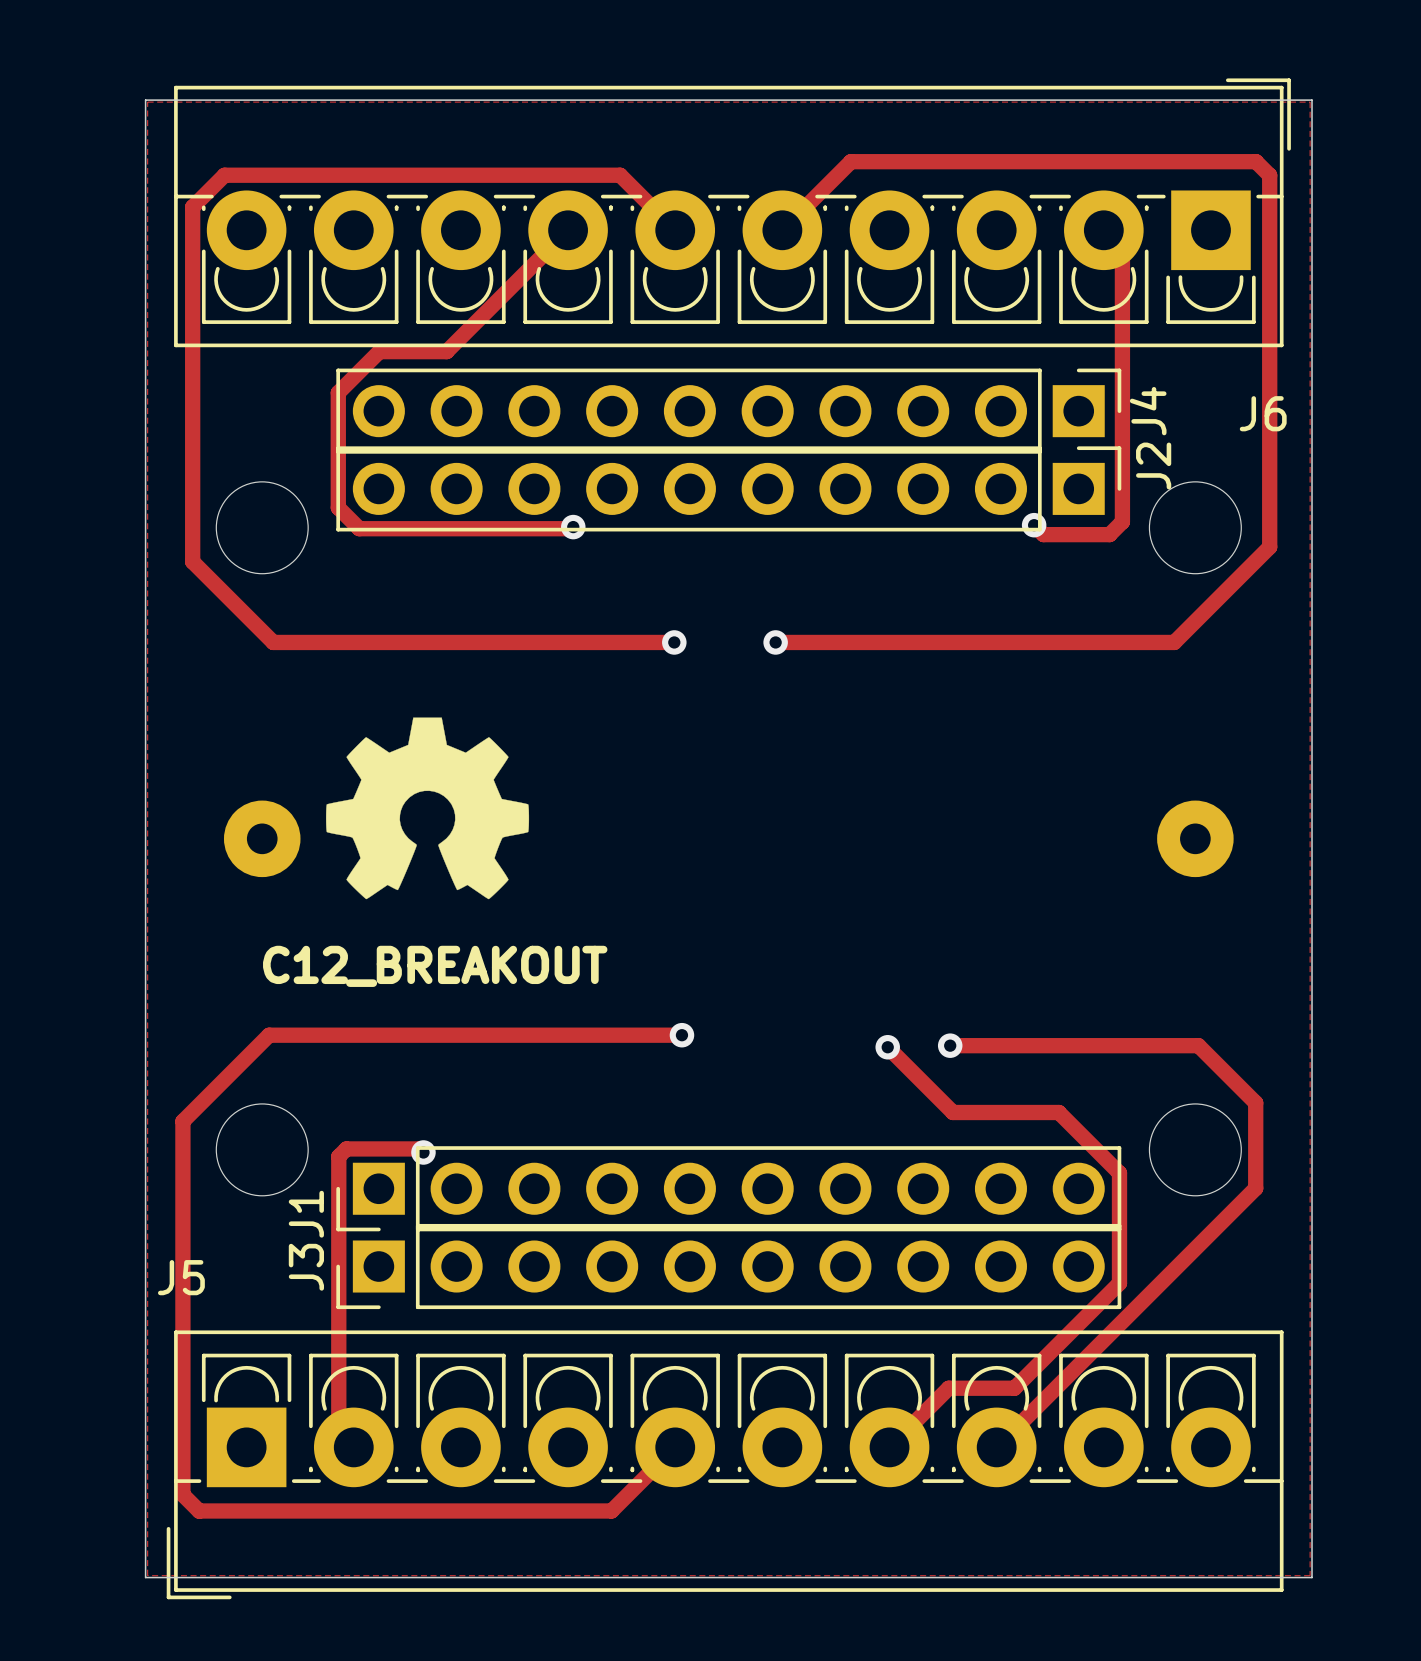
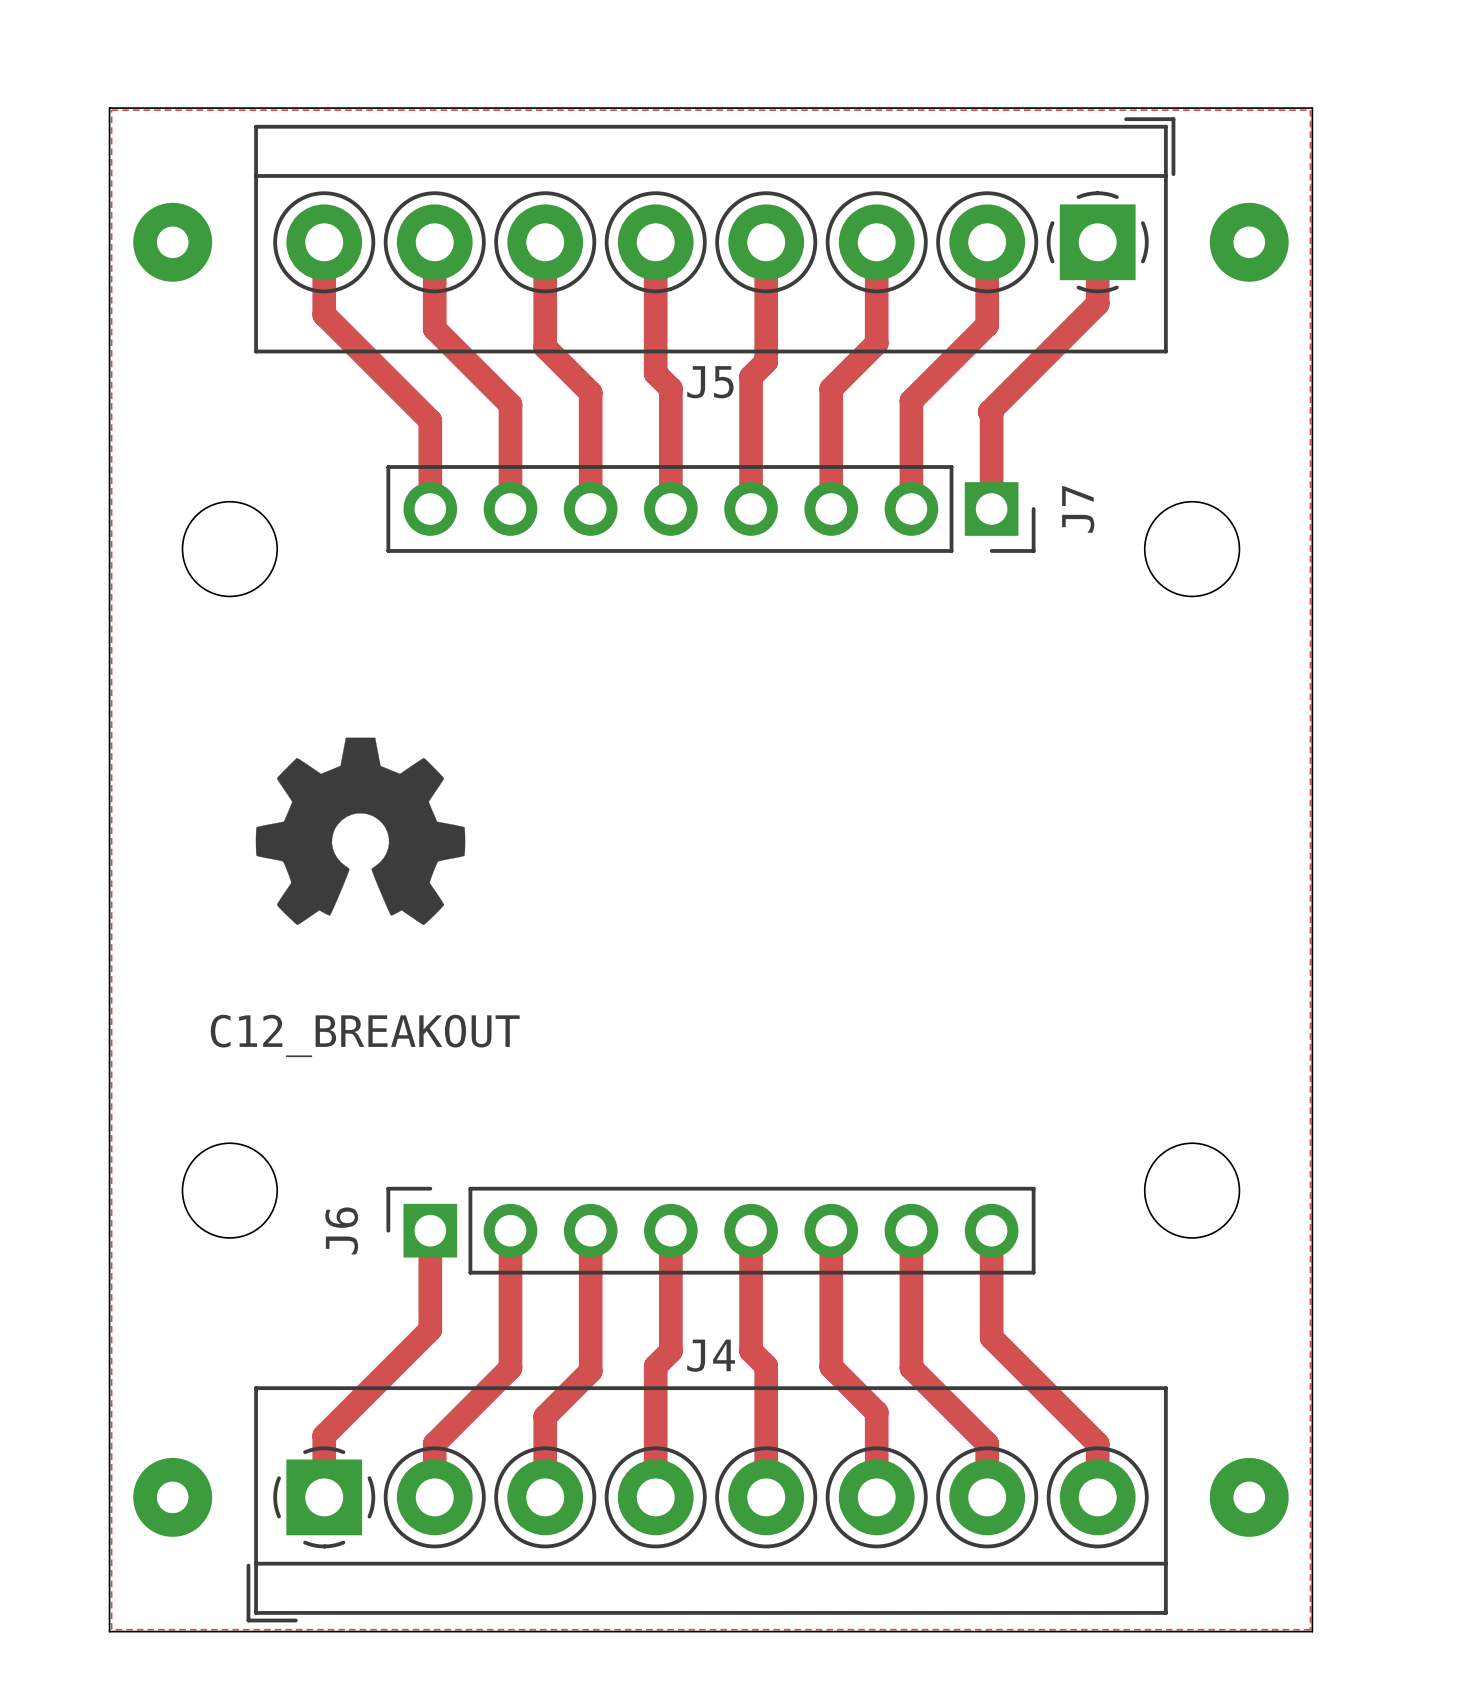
J6 footprint: [174, 78, 1291, 348] -> [386, 1186, 1036, 1275]
part: none -> (172, 242)
track: none -> (324, 242) (324, 314) (430, 420) (430, 508)
track: none -> (434, 242) (434, 328) (510, 404) (510, 508)
track: (568, 230) (446, 351) (379, 351) (338, 392) (338, 507) (359, 528) (571, 528) (573, 527) -> (545, 242) (545, 347) (590, 392) (590, 508)
track: (675, 230) (620, 175) (224, 175) (192, 207) (192, 561) (273, 642) (674, 642) -> (655, 242) (655, 373) (670, 388) (670, 508)
track: (782, 230) (850, 161) (1256, 161) (1269, 175) (1269, 547) (1174, 642) (775, 642) -> (766, 242) (766, 361) (751, 376) (751, 508)
track: none -> (876, 242) (876, 343) (831, 388) (831, 508)
track: none -> (987, 242) (987, 325) (911, 400) (911, 508)
track: (1103, 230) (1122, 248) (1122, 521) (1109, 534) (1043, 534) (1034, 525) -> (1097, 242) (1097, 303) (989, 411) (991, 413) (991, 508)
part: none -> (1249, 242)
J4 footprint: [336, 368, 1122, 454] -> [246, 1386, 1168, 1623]
J4 name position: J4 (1148, 411) -> J4 (711, 1355)
J6 name position: J6 (1263, 413) -> J6 (341, 1230)
J2: (728, 488) -> none
J7: none -> (710, 508)
via: (1034, 525) -> none
via: (573, 527) -> none
via: (674, 642) -> none
via: (775, 642) -> none
drawing position: (427, 808) -> (360, 831)
part: (262, 838) -> none
part: (1195, 838) -> none
text position: C12_BREAKOUT (435, 966) -> C12_BREAKOUT (365, 1035)
track: (681, 1035) (269, 1035) (182, 1121) (182, 1494) (199, 1511) -> none
via: (681, 1035) -> none
track: (950, 1045) (1198, 1045) (1255, 1102) (1255, 1188) (996, 1447) -> (911, 1230) (911, 1368) (987, 1443) (987, 1497)
via: (950, 1045) -> none
track: (887, 1047) (952, 1112) (1058, 1112) (1119, 1173) (1119, 1283) (1014, 1388) (948, 1388) (889, 1447) -> (831, 1230) (831, 1367) (876, 1412) (876, 1497)
via: (887, 1047) -> none
track: (423, 1152) (419, 1148) (346, 1148) (338, 1156) (338, 1432) (353, 1447) -> (430, 1230) (430, 1329) (324, 1435) (324, 1497)
via: (423, 1152) -> none
track: none -> (510, 1230) (510, 1368) (434, 1443) (434, 1497)
track: none -> (590, 1230) (590, 1371) (545, 1416) (545, 1497)
J1: (728, 1188) -> none
track: none -> (751, 1230) (751, 1350) (766, 1366) (766, 1497)
track: none -> (991, 1230) (991, 1337) (1097, 1443) (1097, 1497)
J3: (728, 1266) -> none
J5 name position: J5 (181, 1277) -> J5 (710, 382)
J5 footprint: [166, 1330, 1284, 1600] -> [254, 117, 1176, 354]
part: none -> (172, 1497)
track: (675, 1447) (611, 1510) (199, 1510) -> (655, 1497) (655, 1366) (670, 1351) (670, 1230)
part: none -> (1249, 1497)

